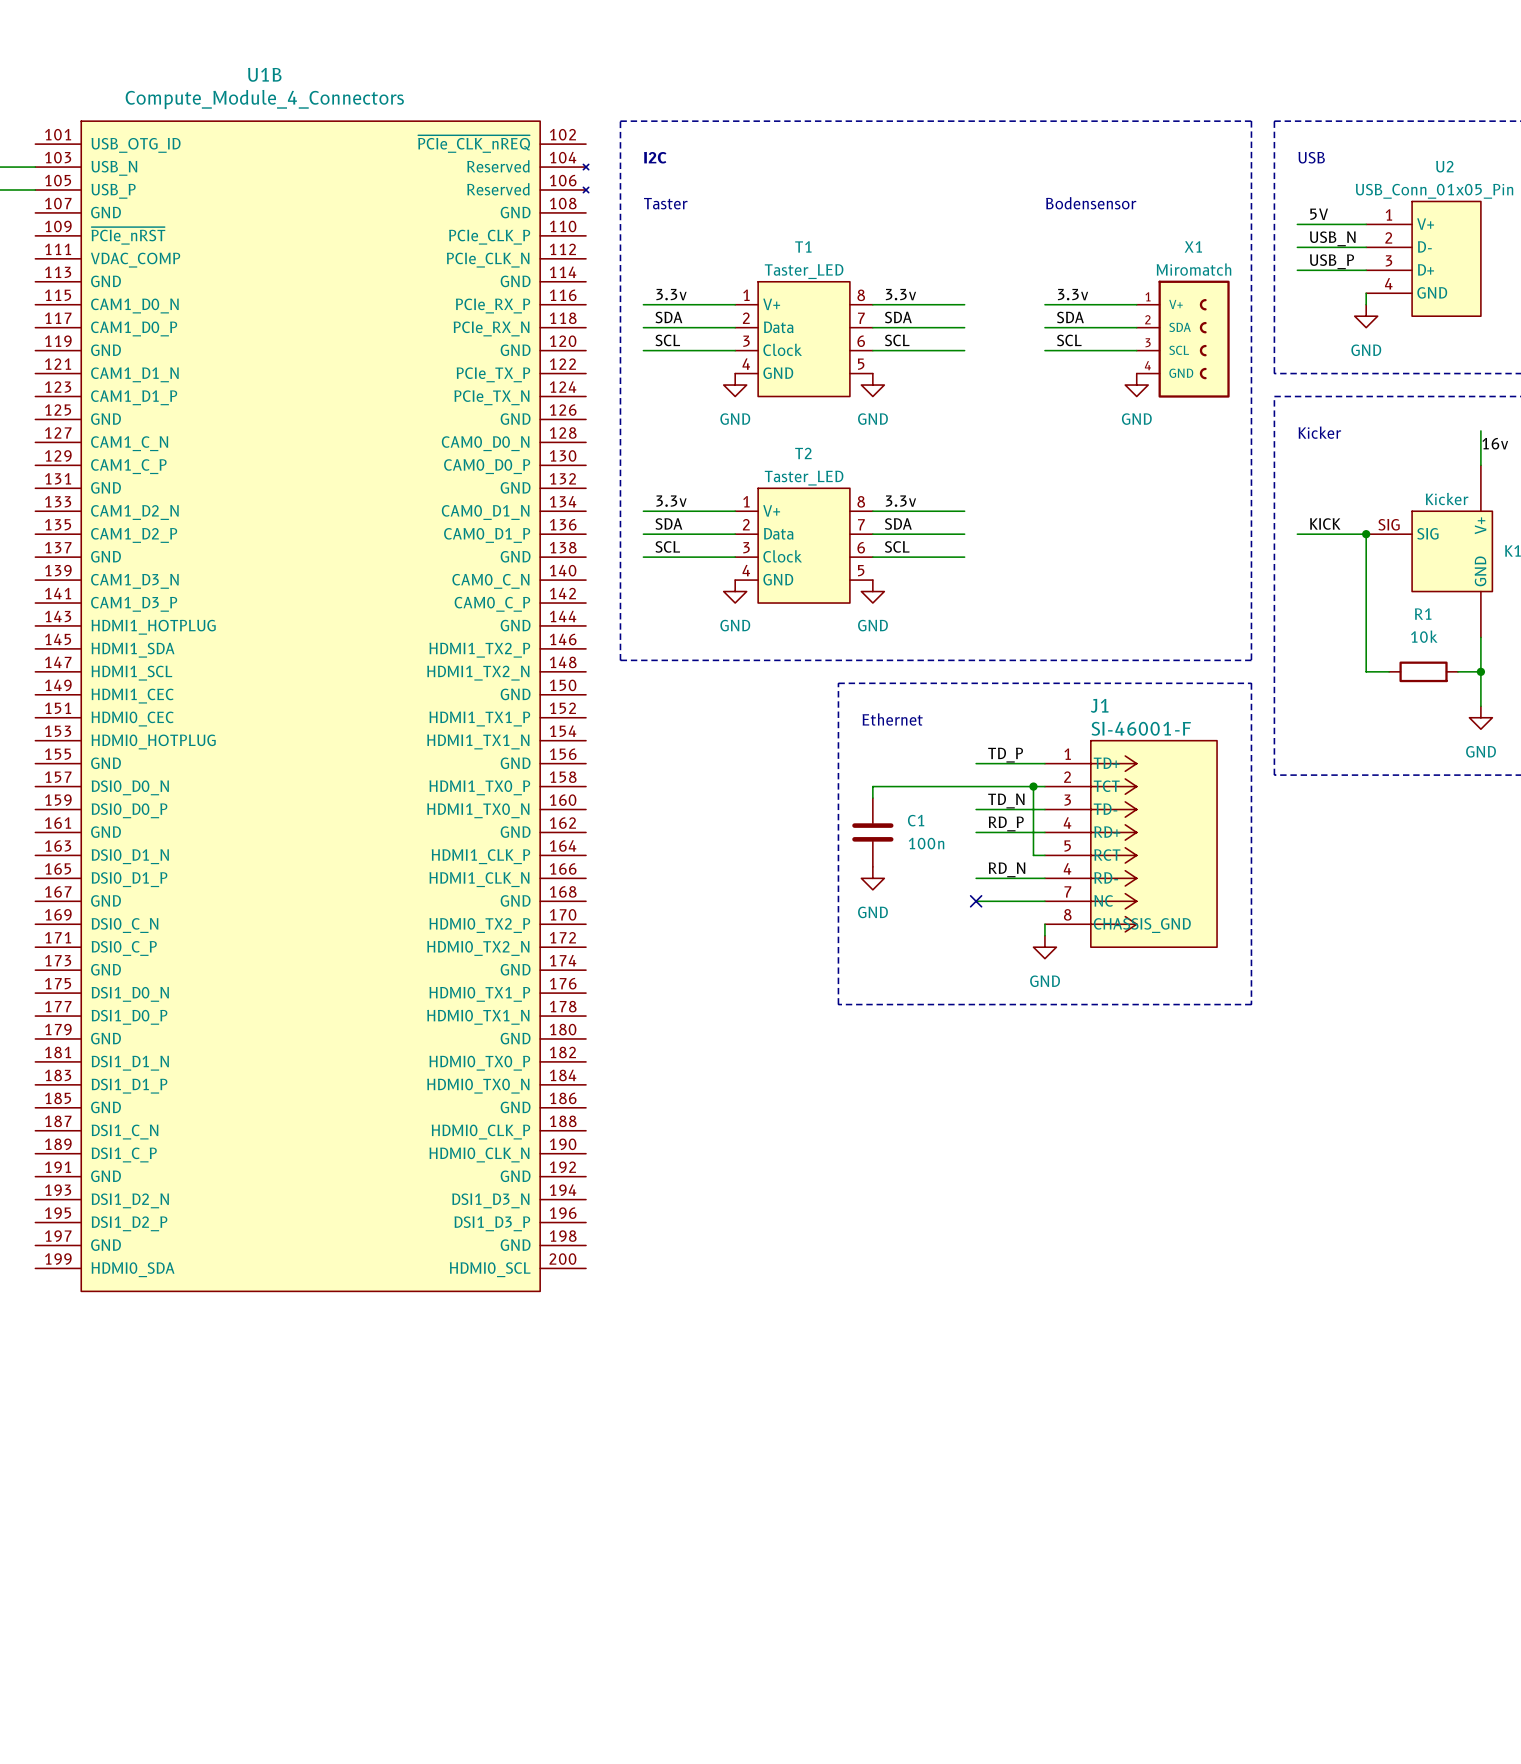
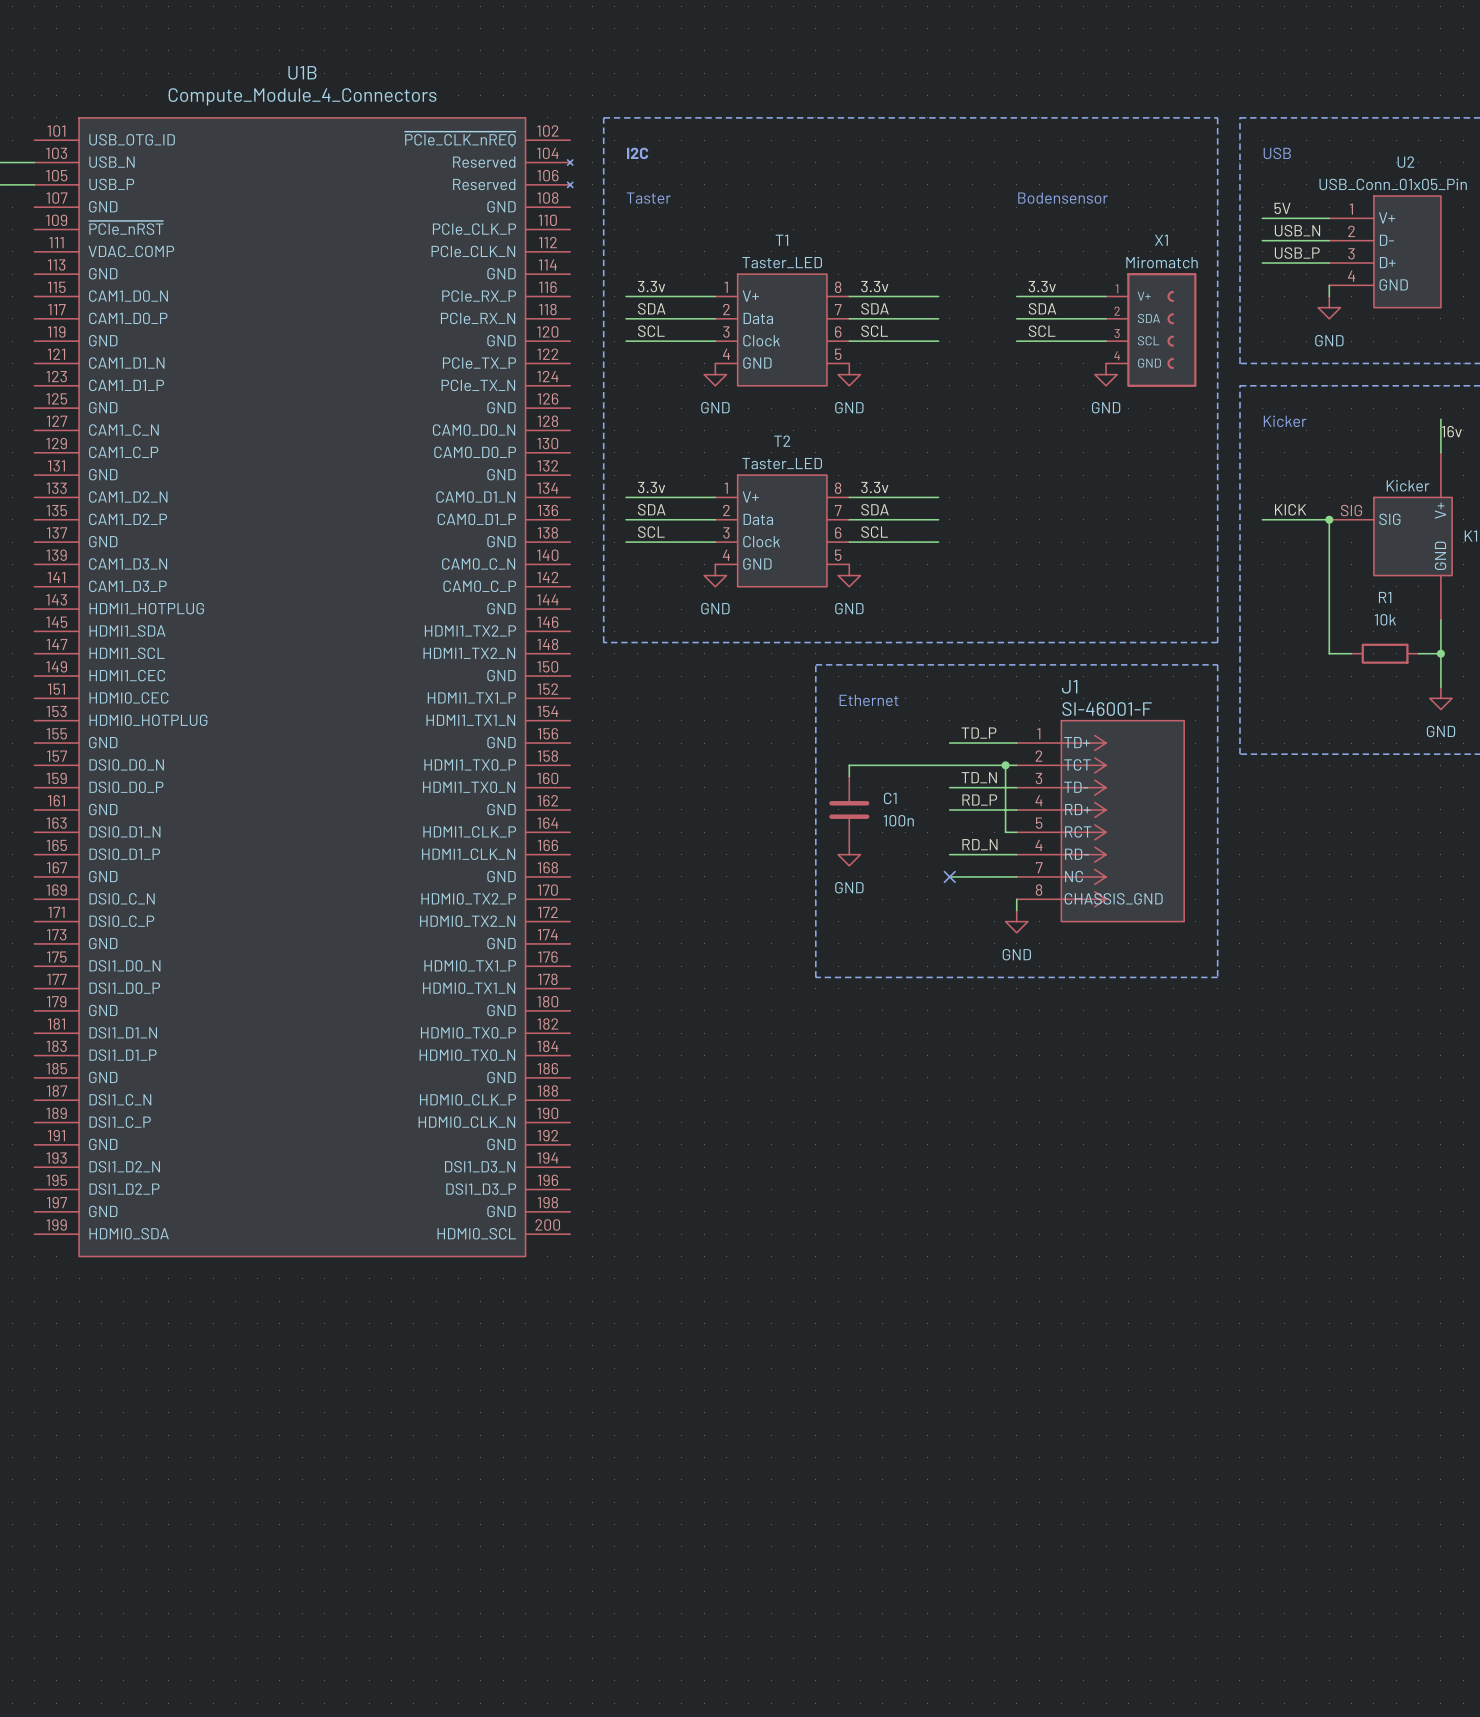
U1B name position: U1B (264, 74) -> U1B (302, 72)
U1B value position: Compute_Module_4_Connectors (264, 99) -> Compute_Module_4_Connectors (302, 96)

